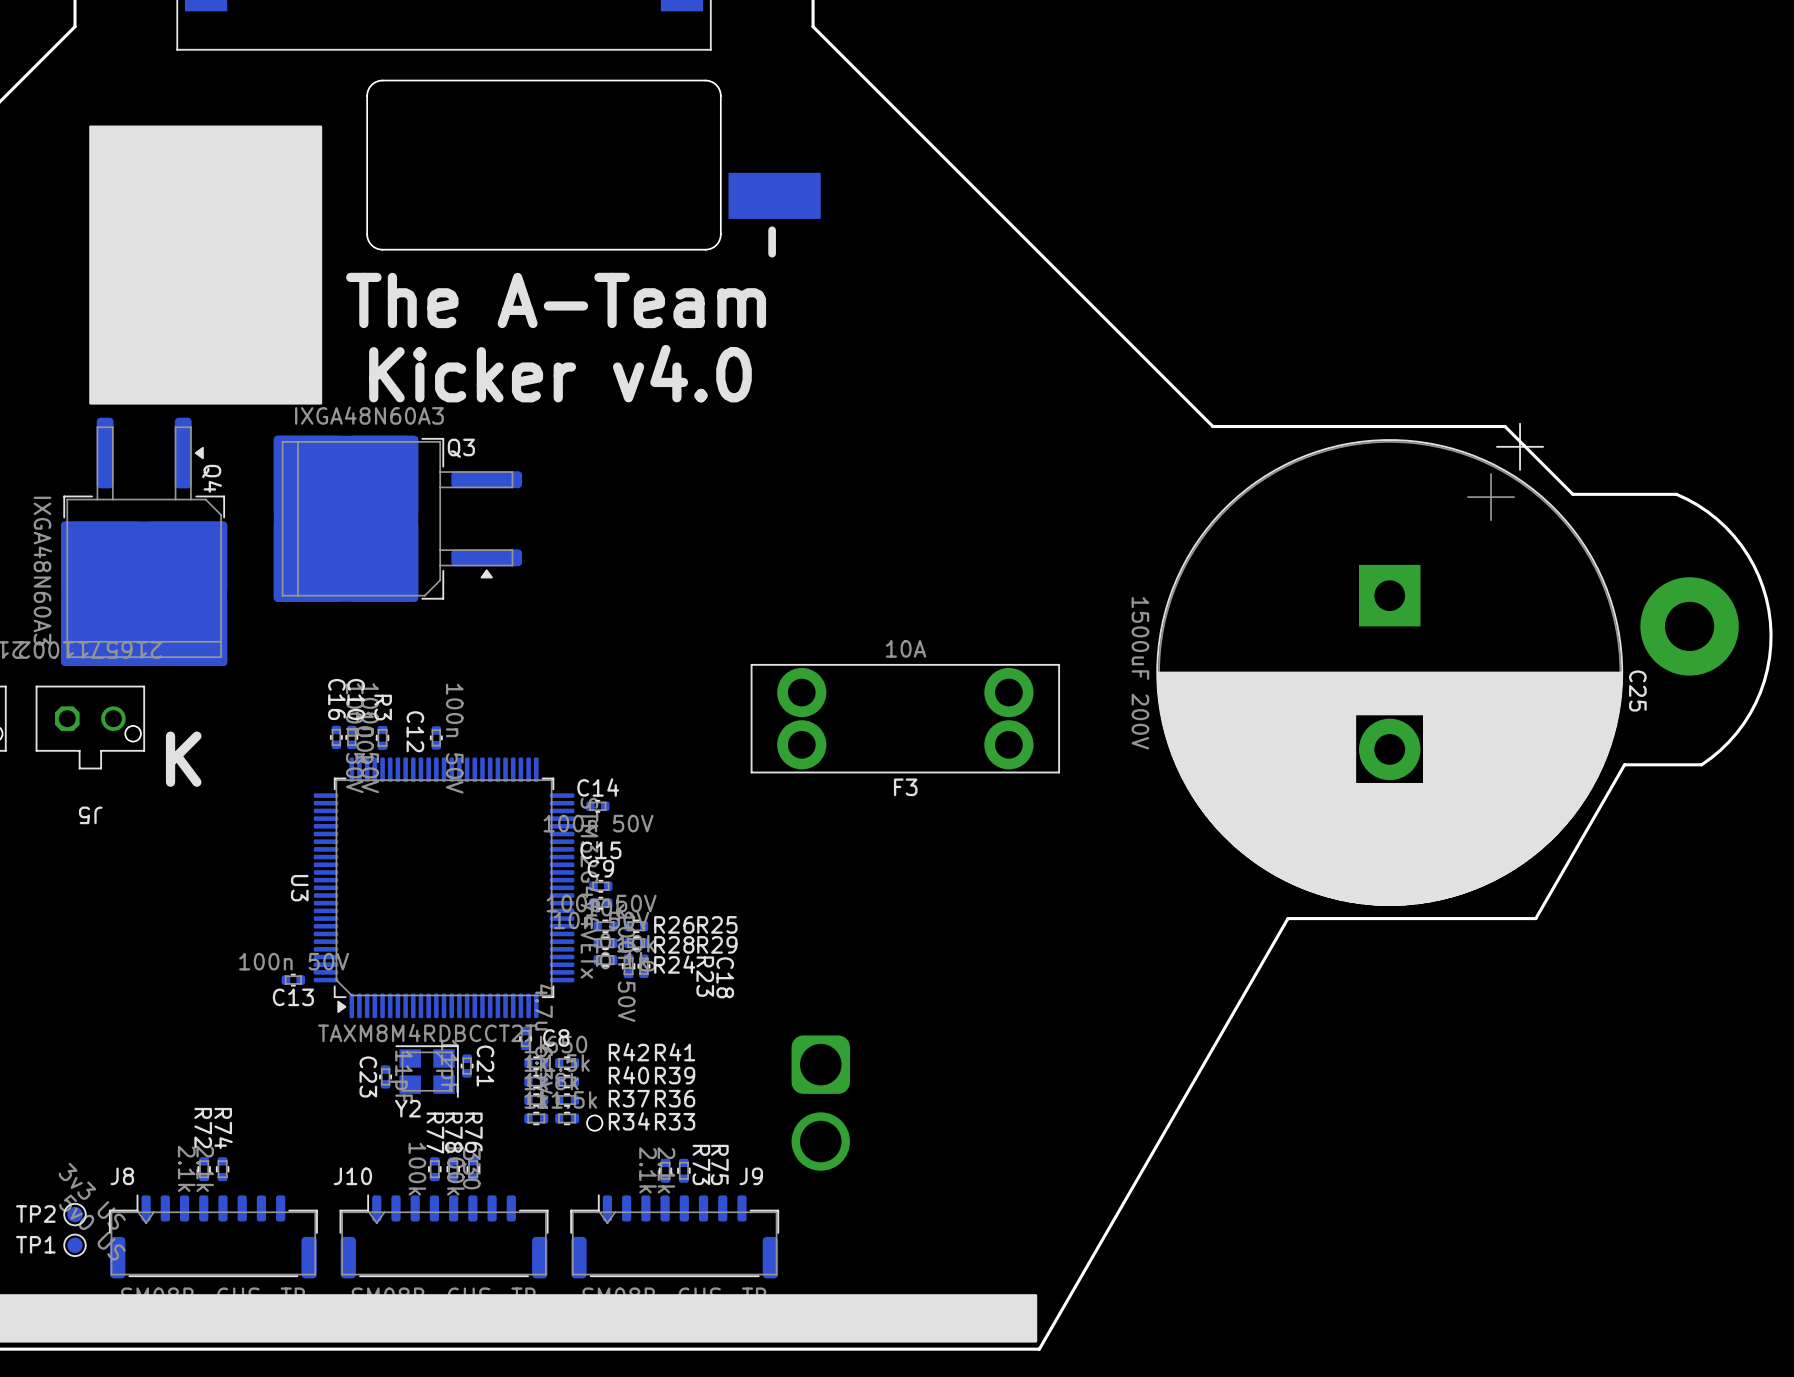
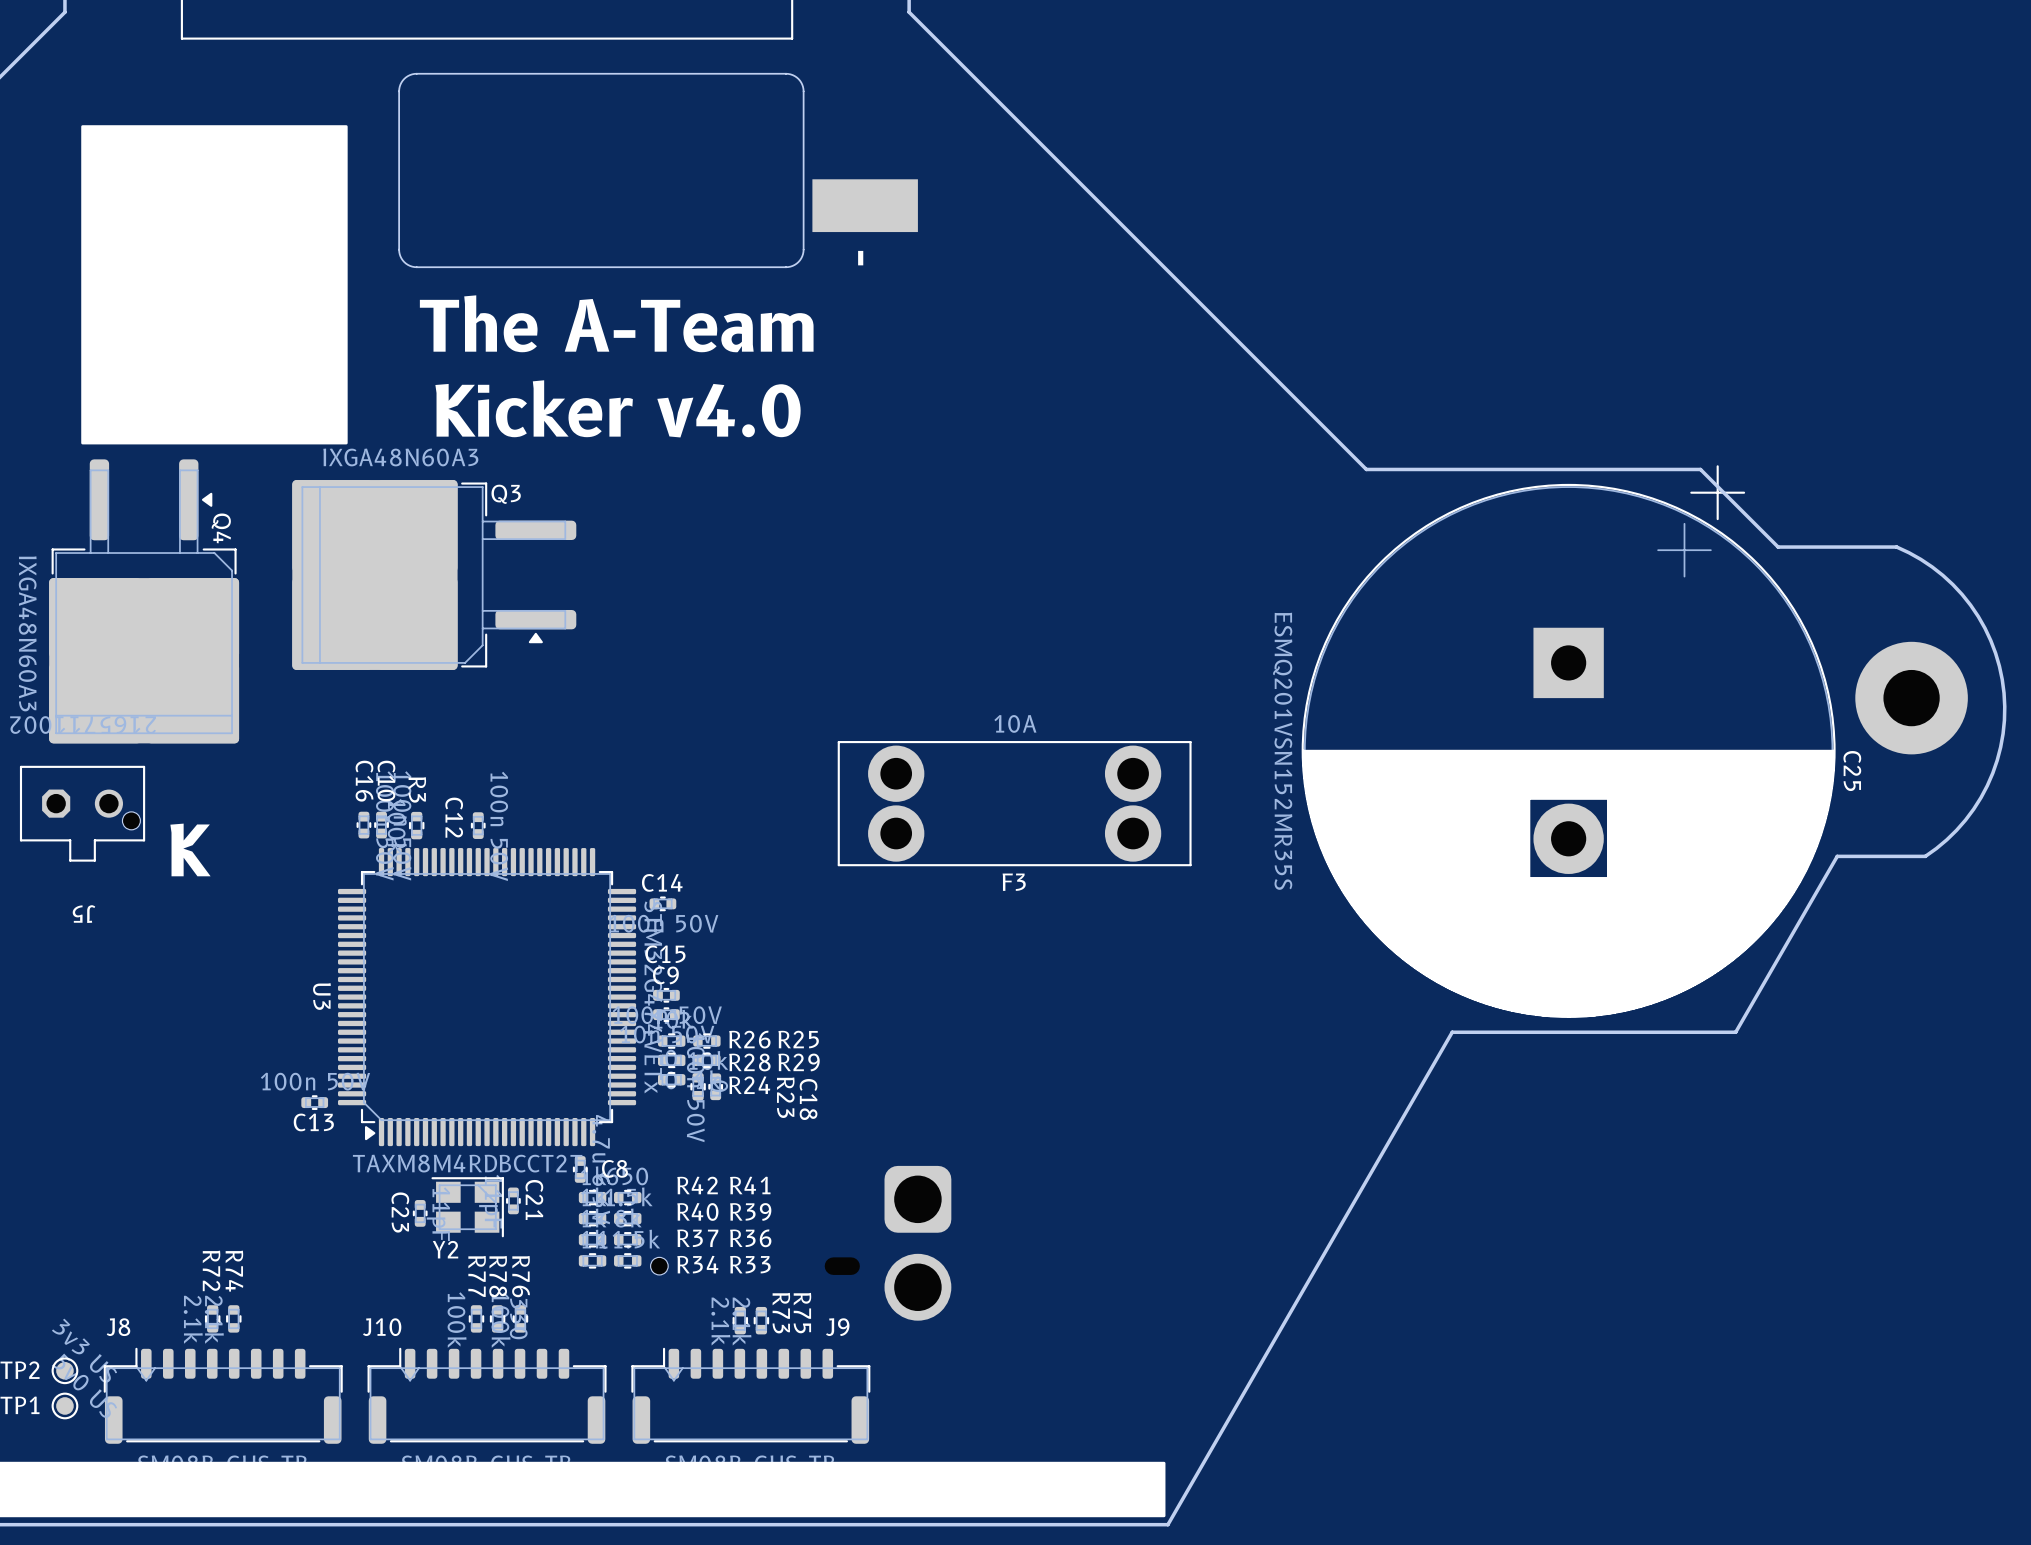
C25 value: 1500uF 200V (1140, 673) -> ESMQ201VSN152MR35S (1282, 751)

